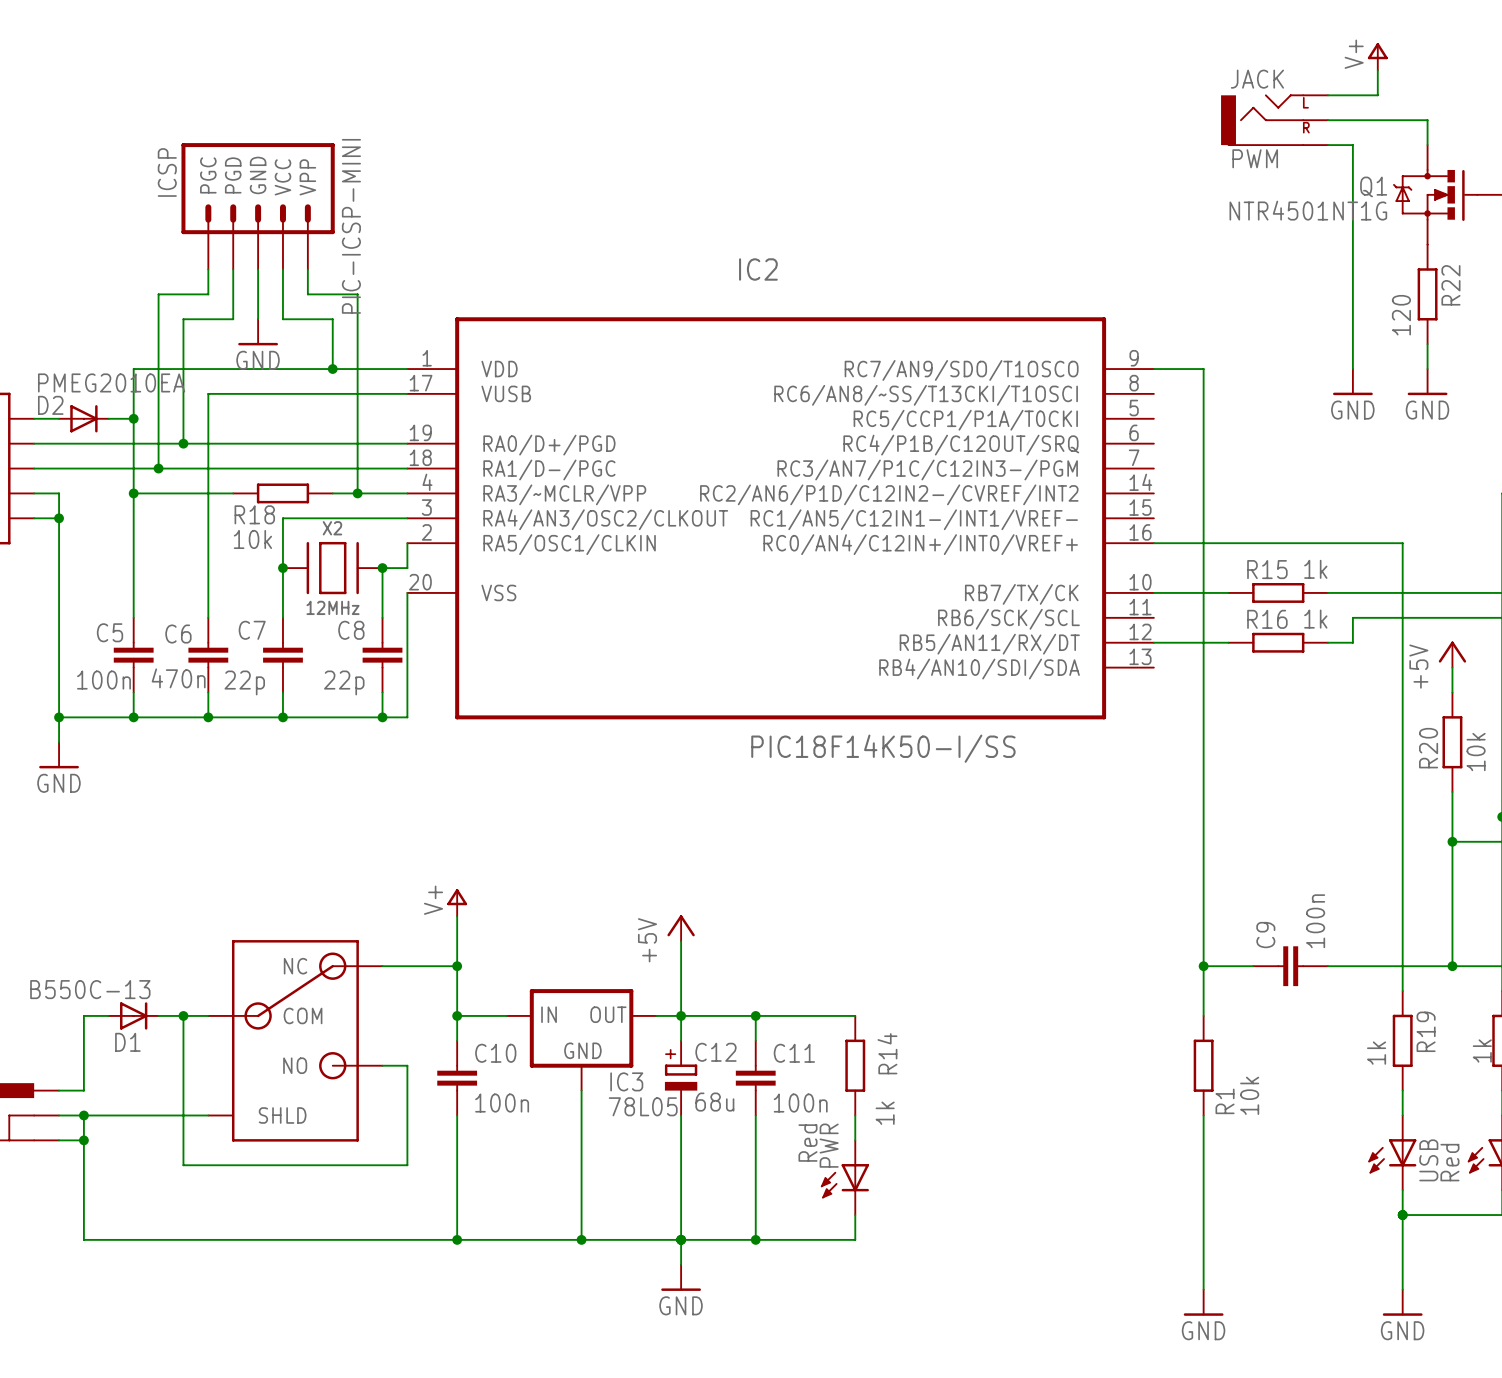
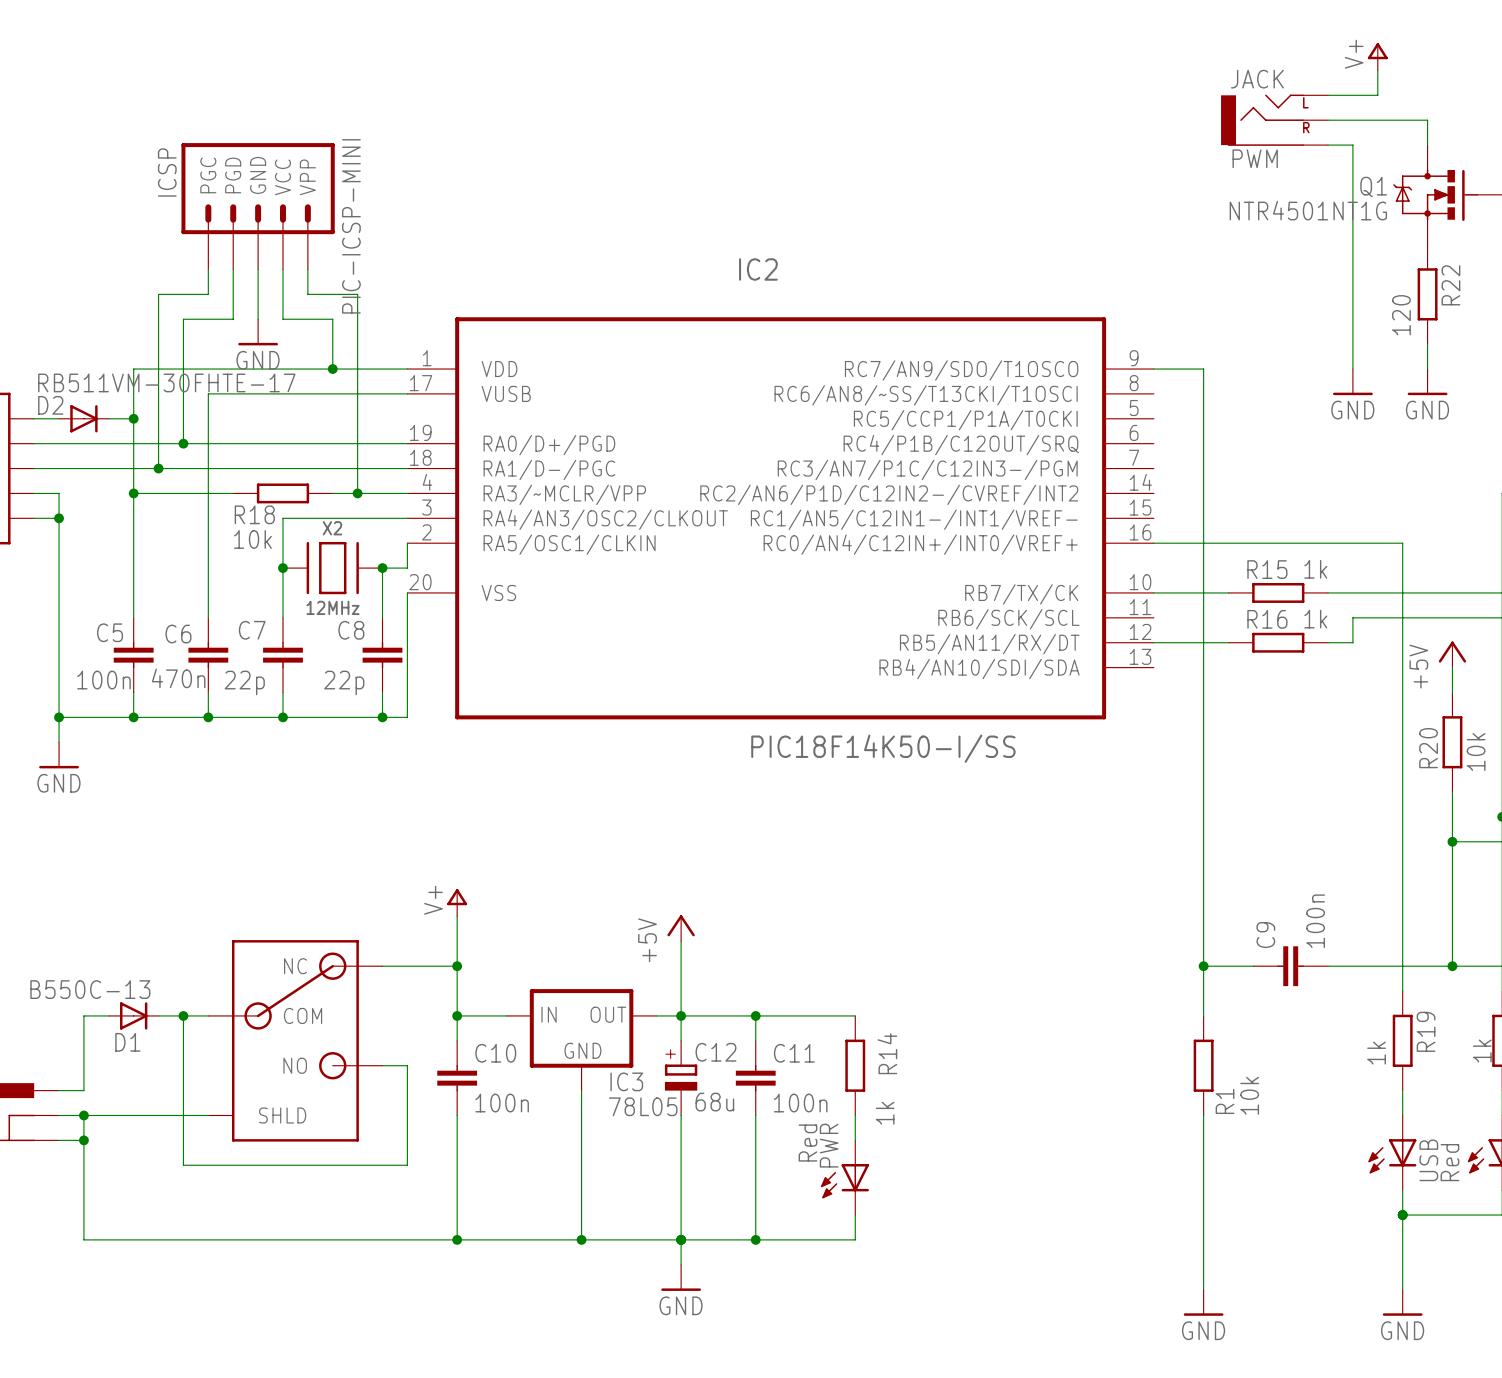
D2 value: PMEG2010EA (111, 382) -> RB511VM-30FHTE-17 (166, 382)

